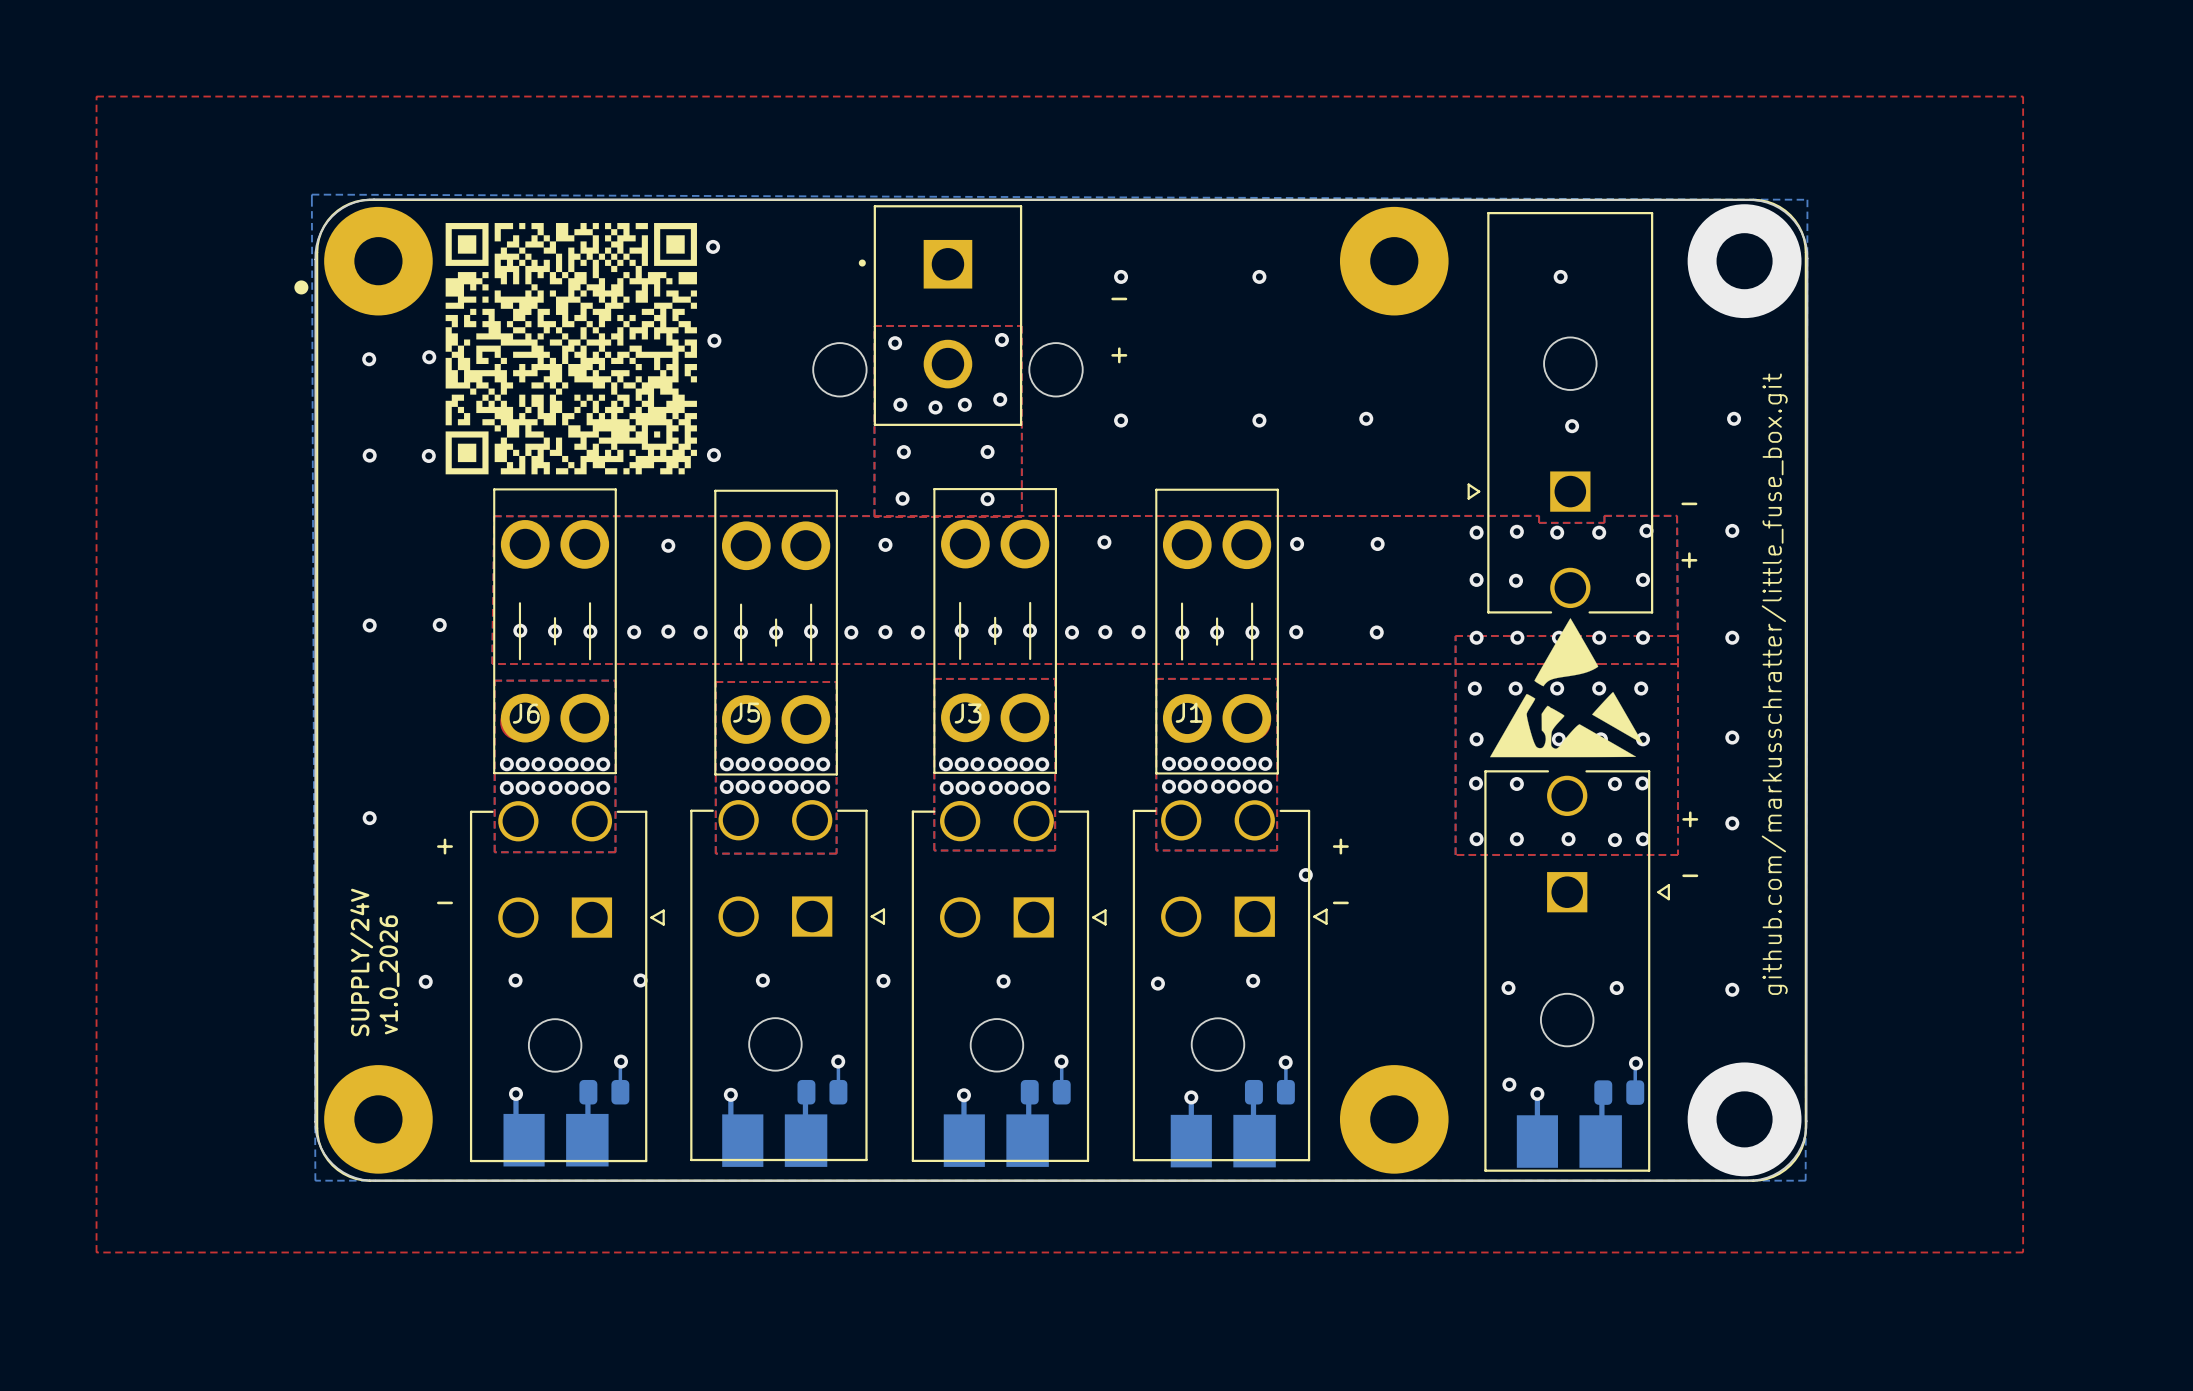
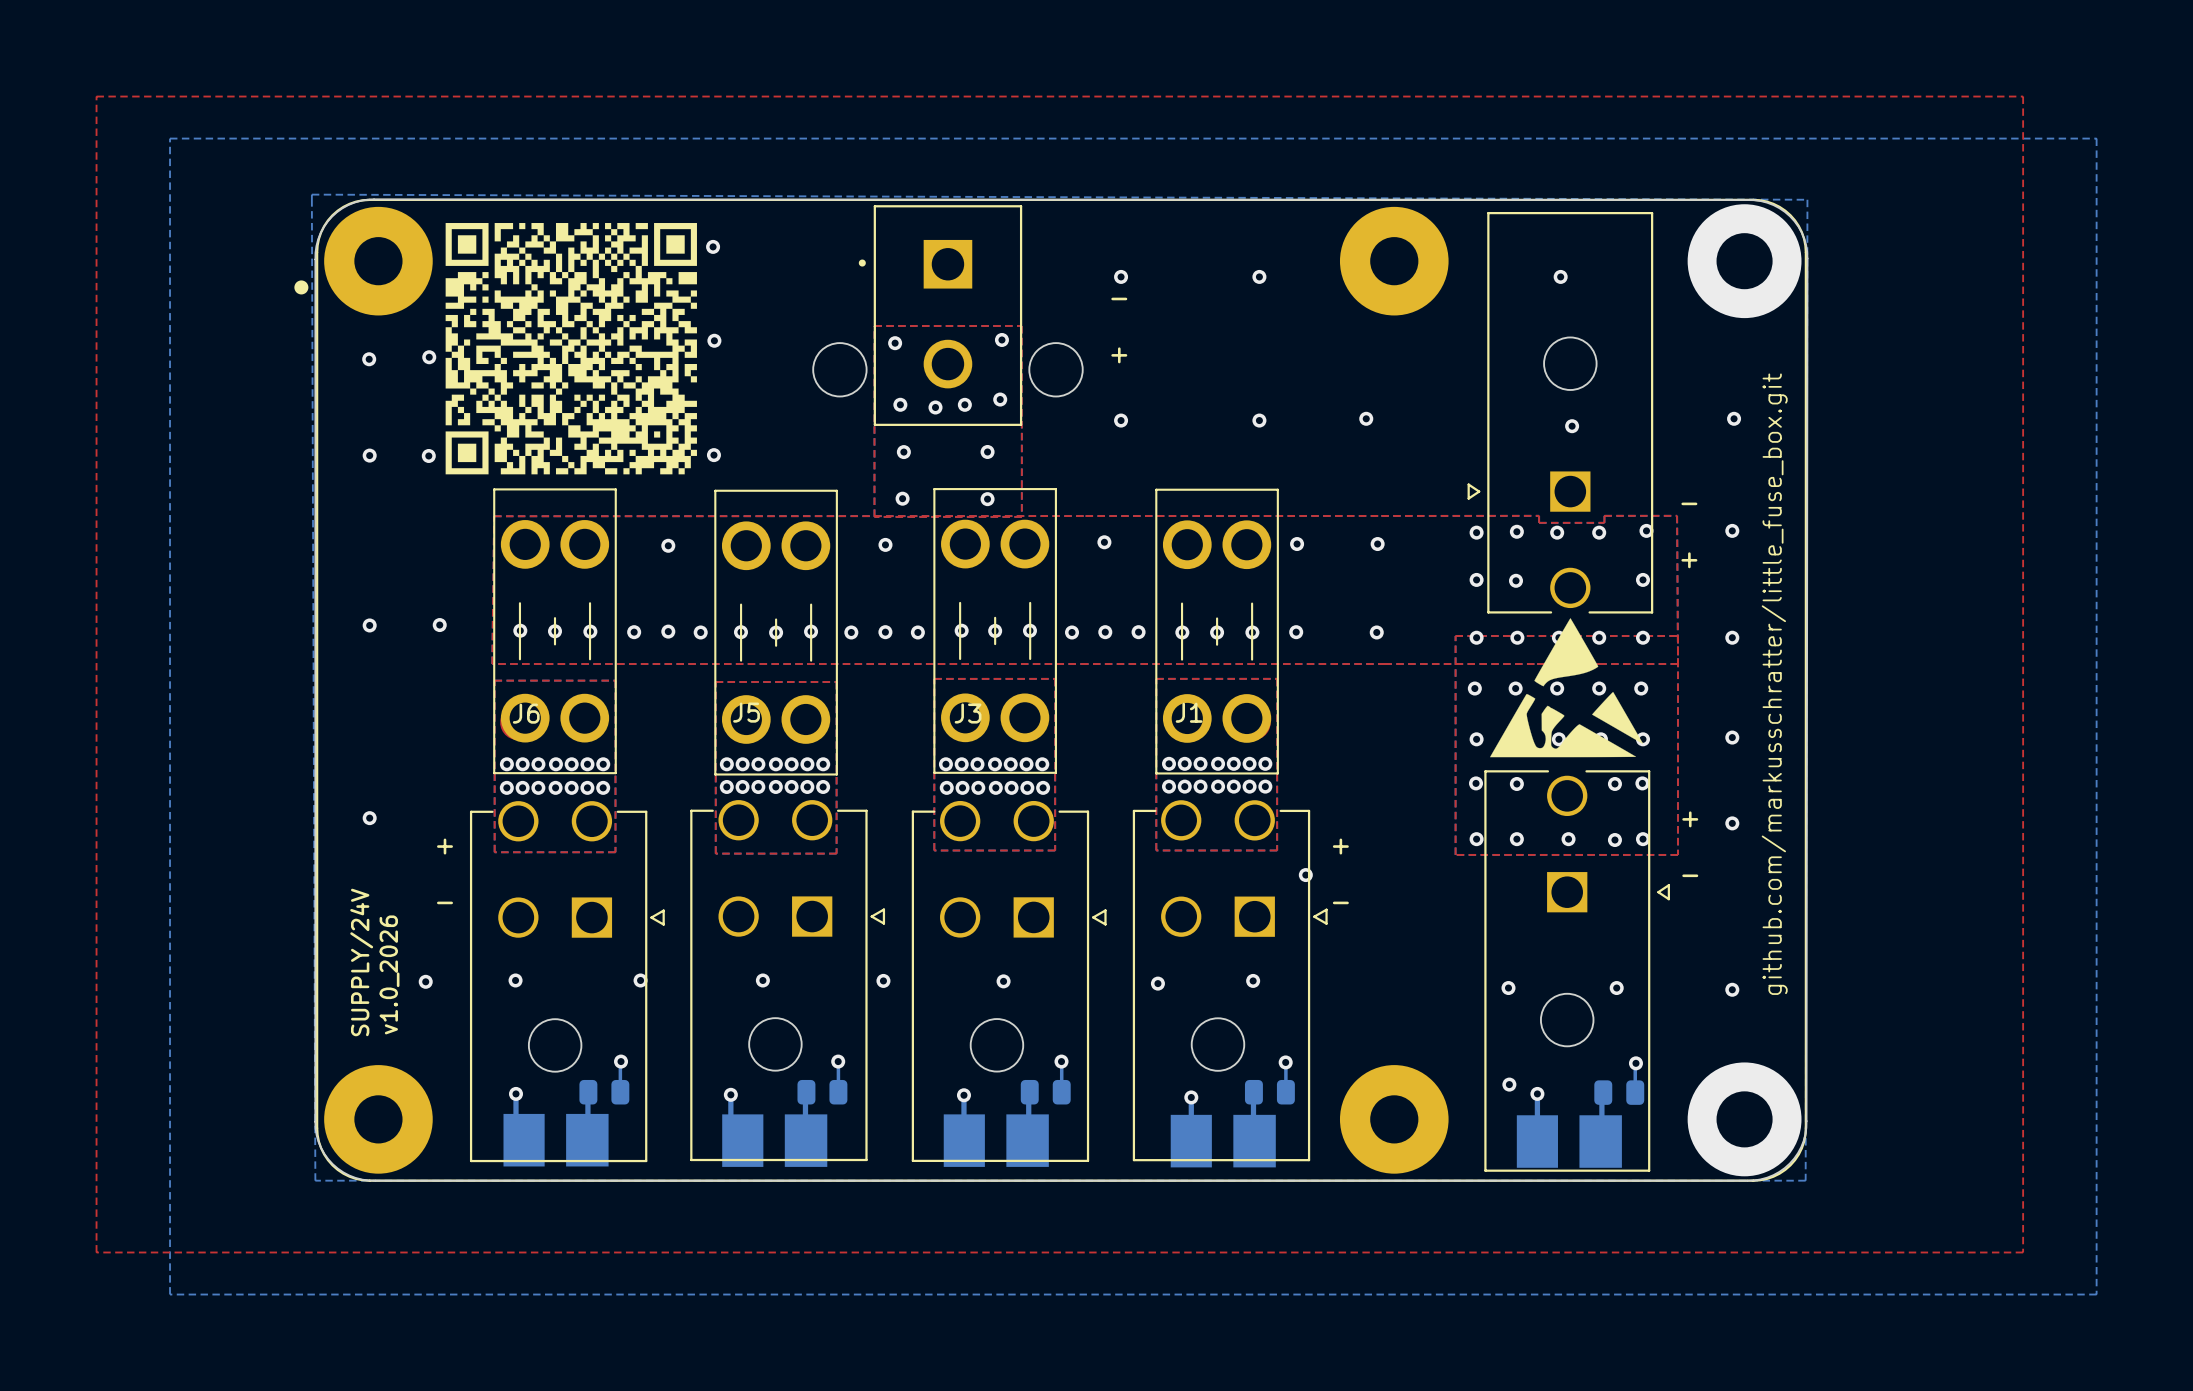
bottom zone outline: none -> (170, 138) (170, 1294) (2096, 1294) (2096, 138) (170, 138)

